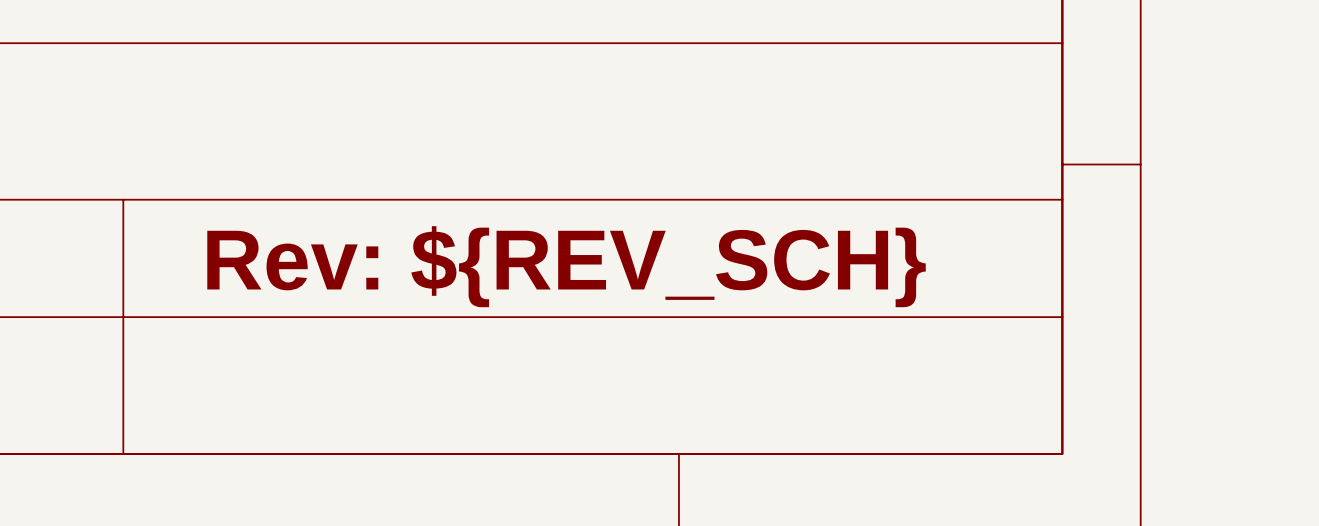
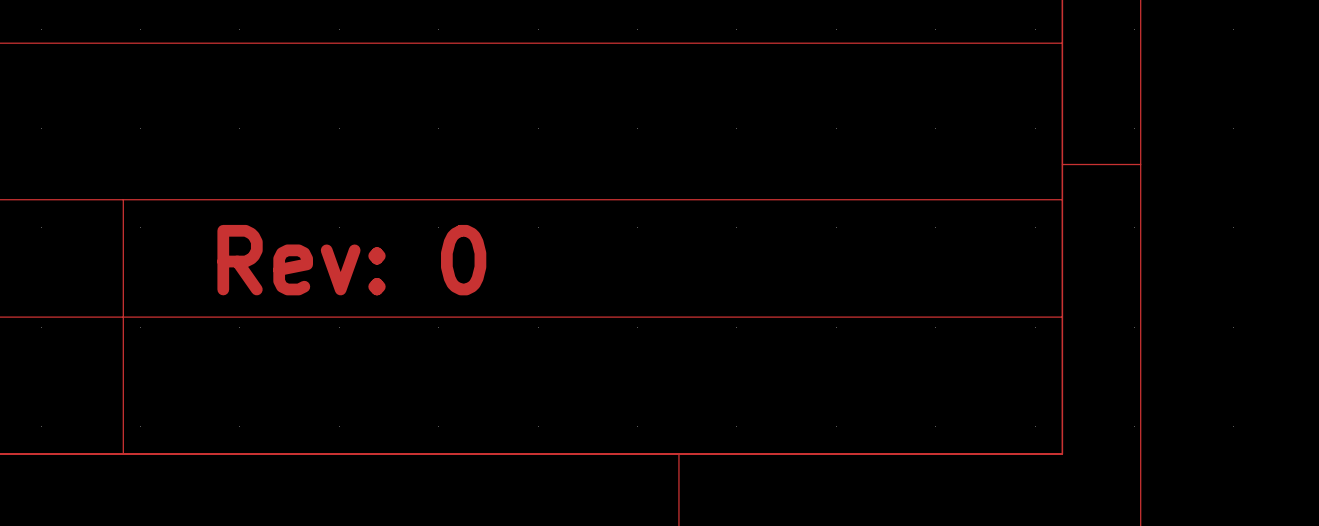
title block: Rev: ${REV_SCH} (566, 266) -> Rev: 0 (351, 260)

